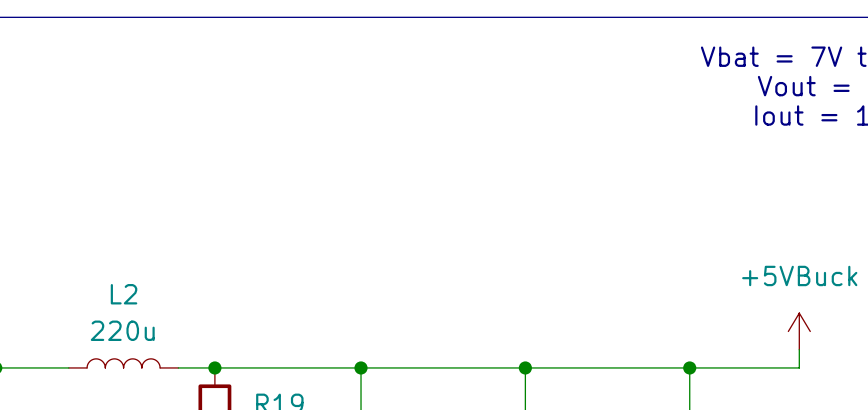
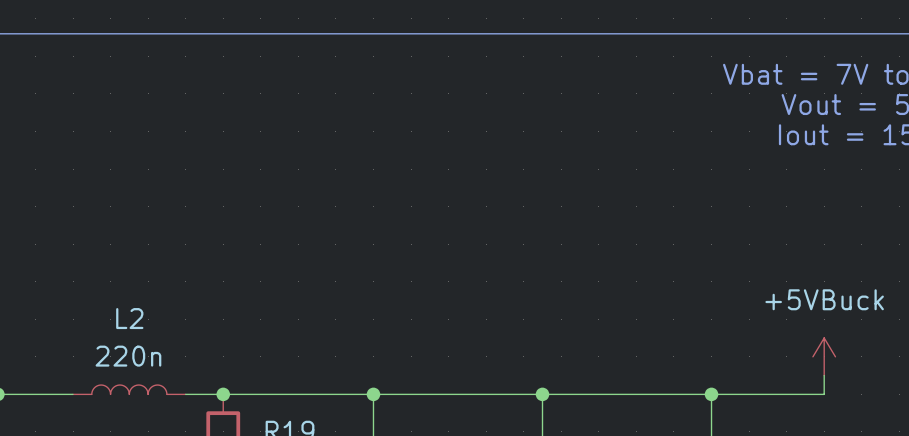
L2 value: 220u (122, 330) -> 220n (128, 356)

